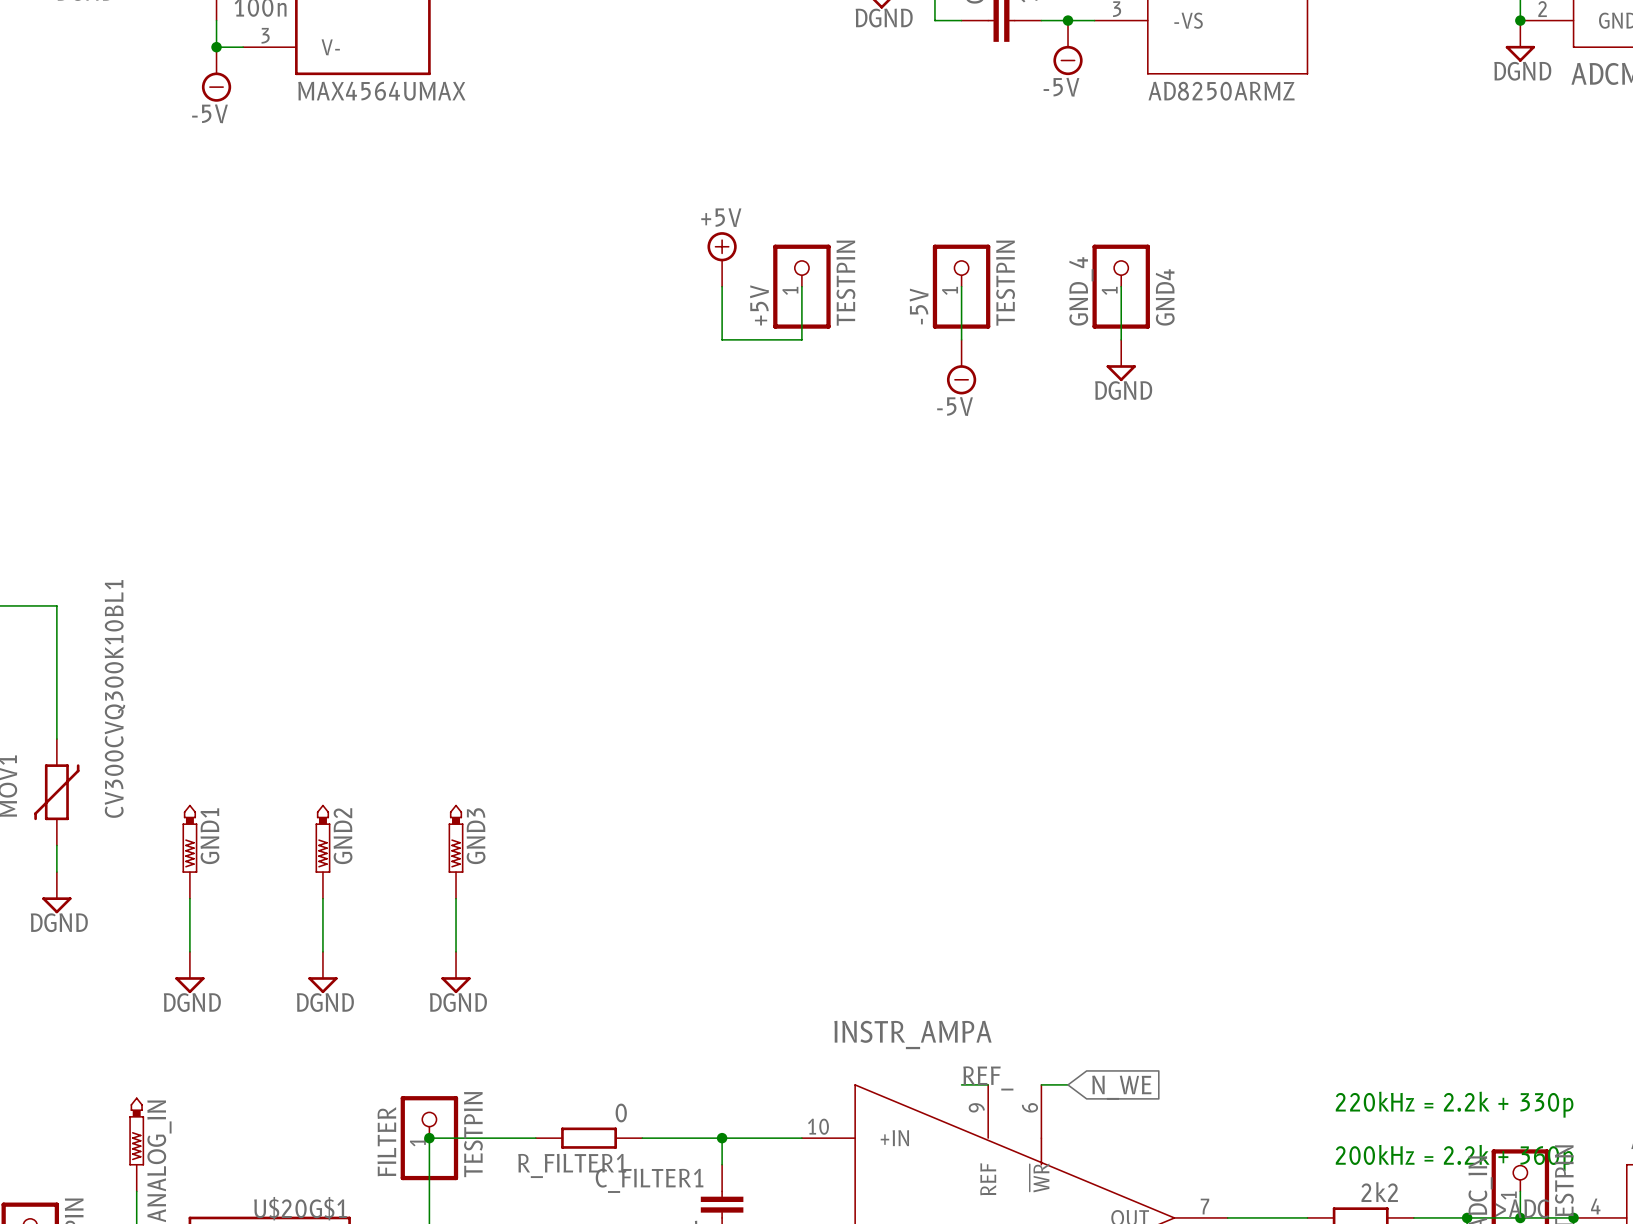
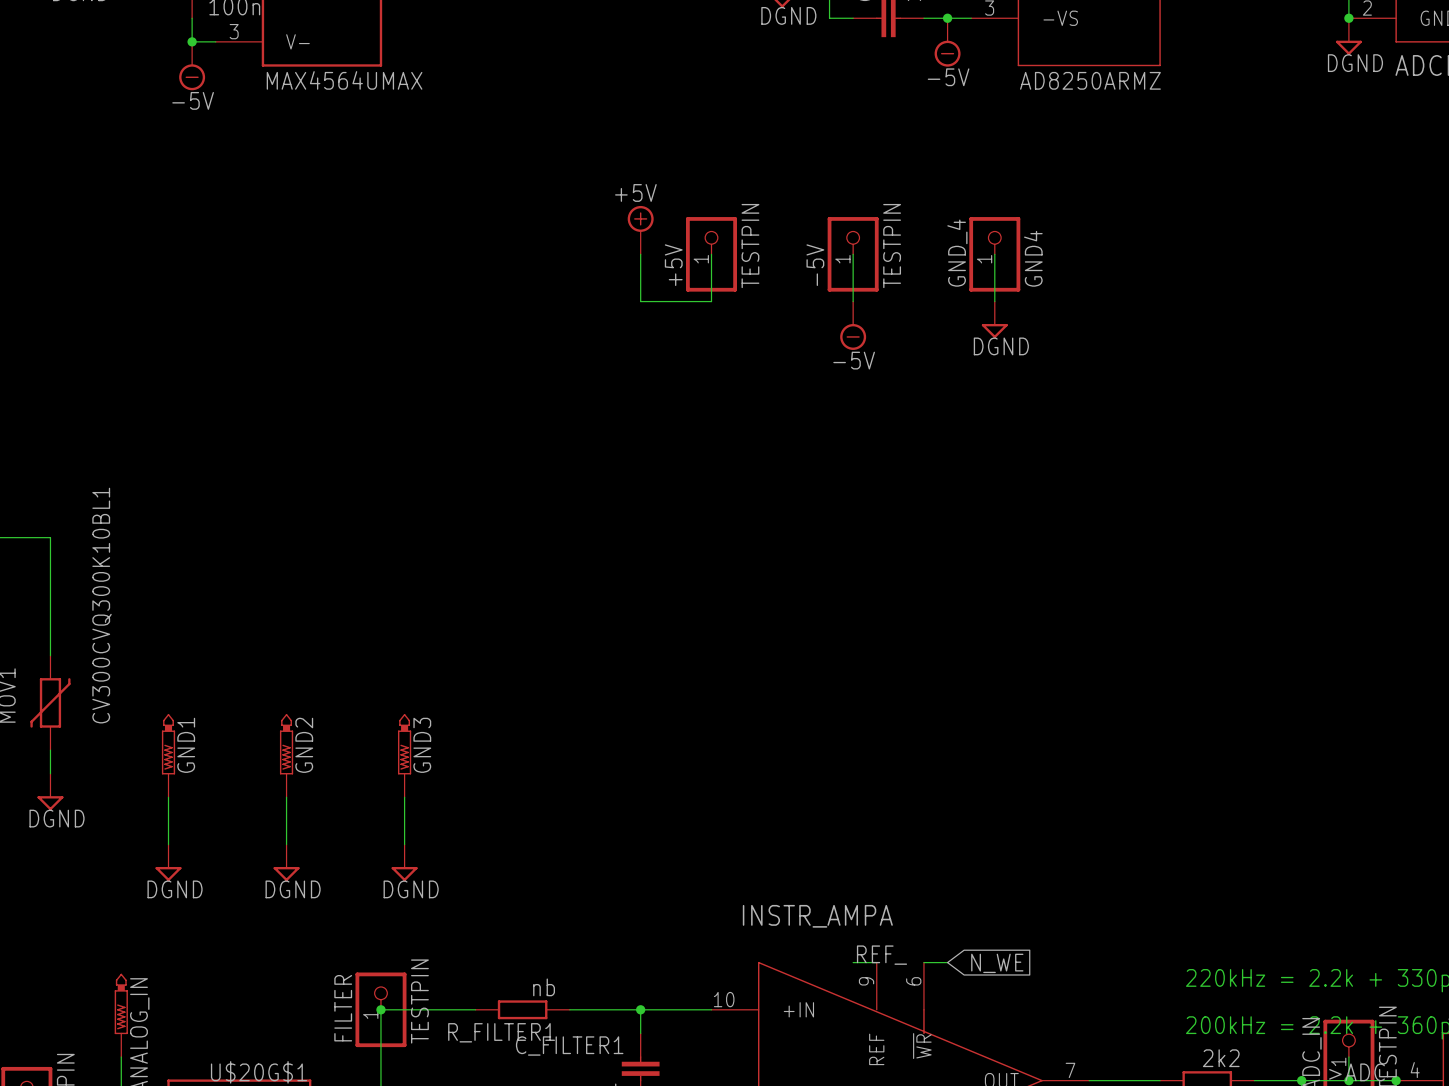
R_FILTER1 value: 0 (621, 1112) -> nb (544, 987)

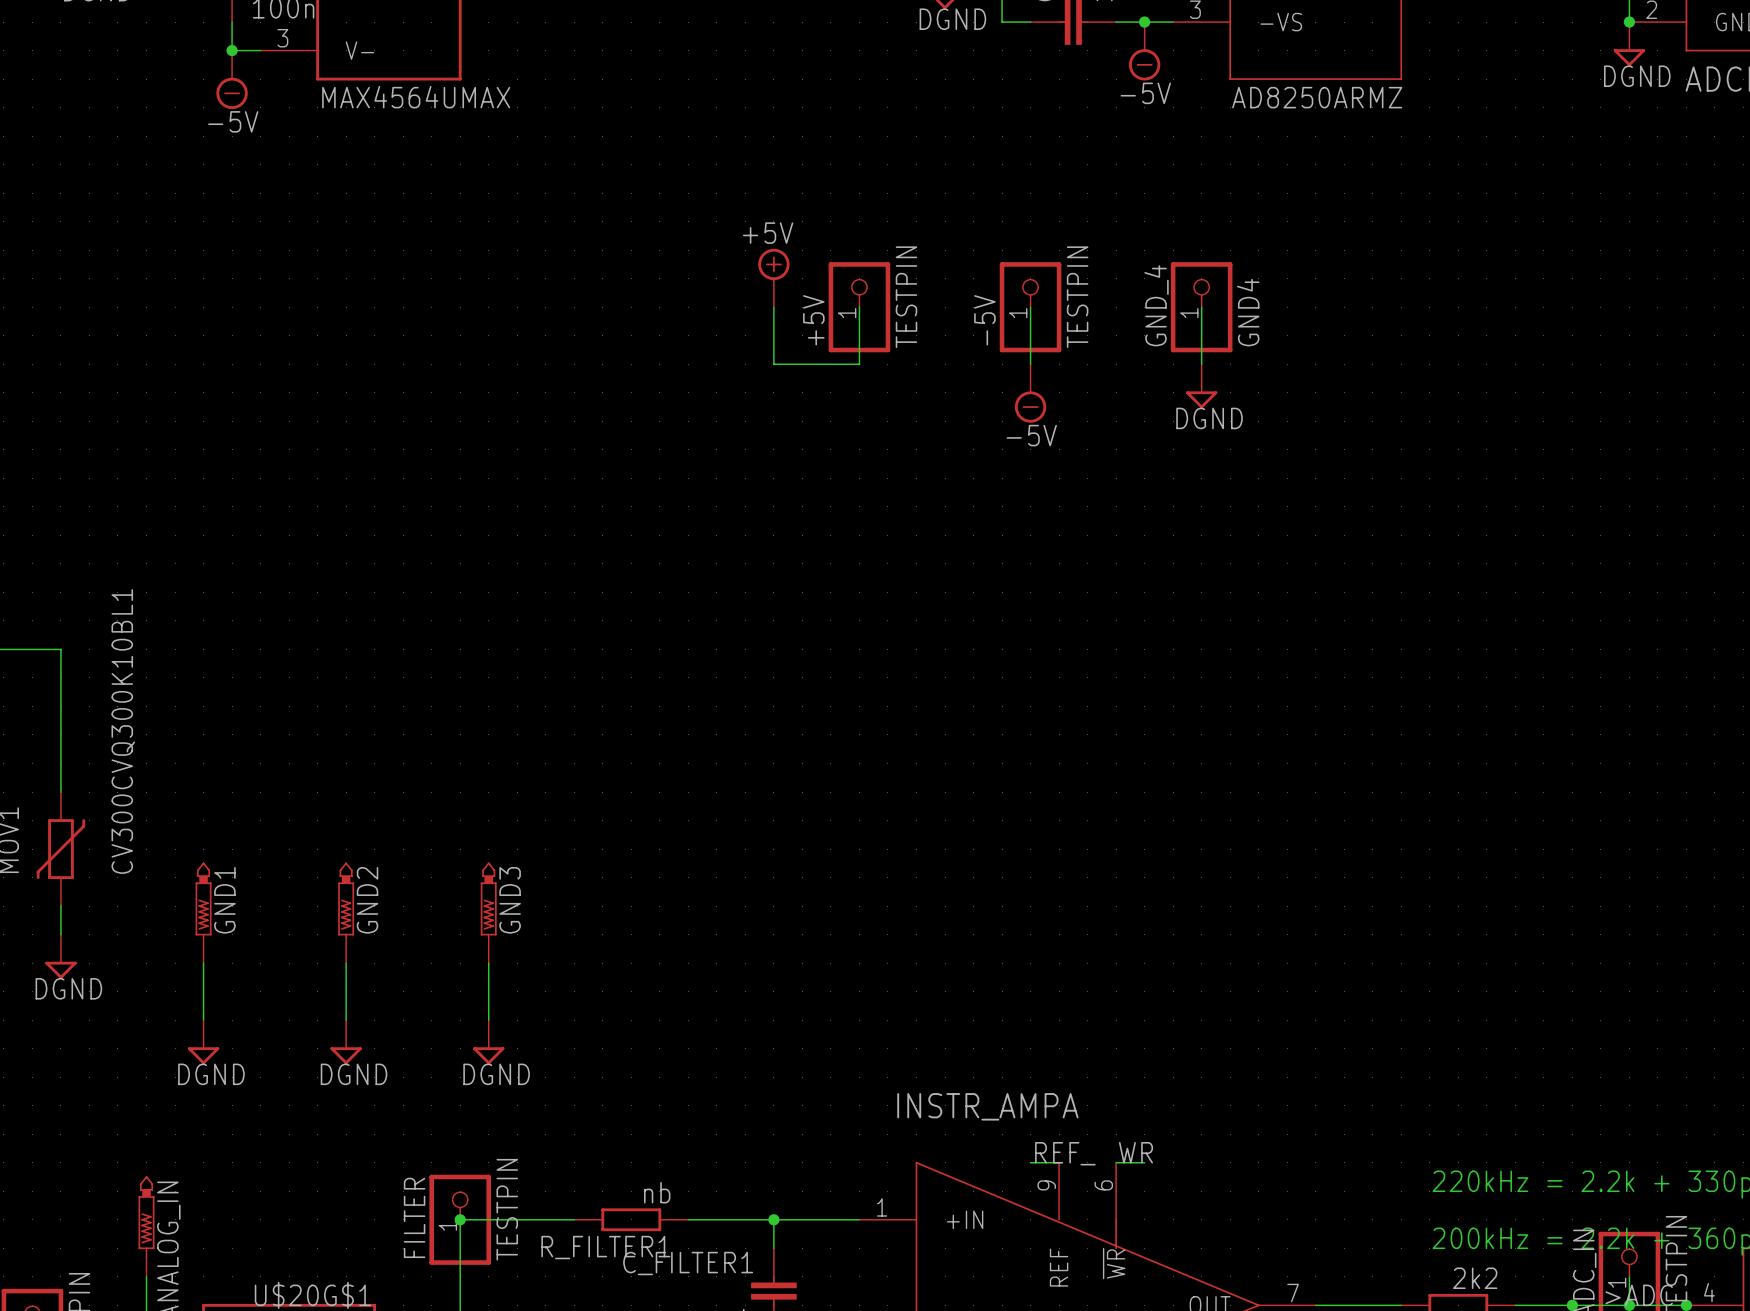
label: none -> WR (1135, 1152)
global label: N_WE (997, 963) -> none
INSTR_AMPA pin number: 10 (724, 999) -> 1 (882, 1207)

